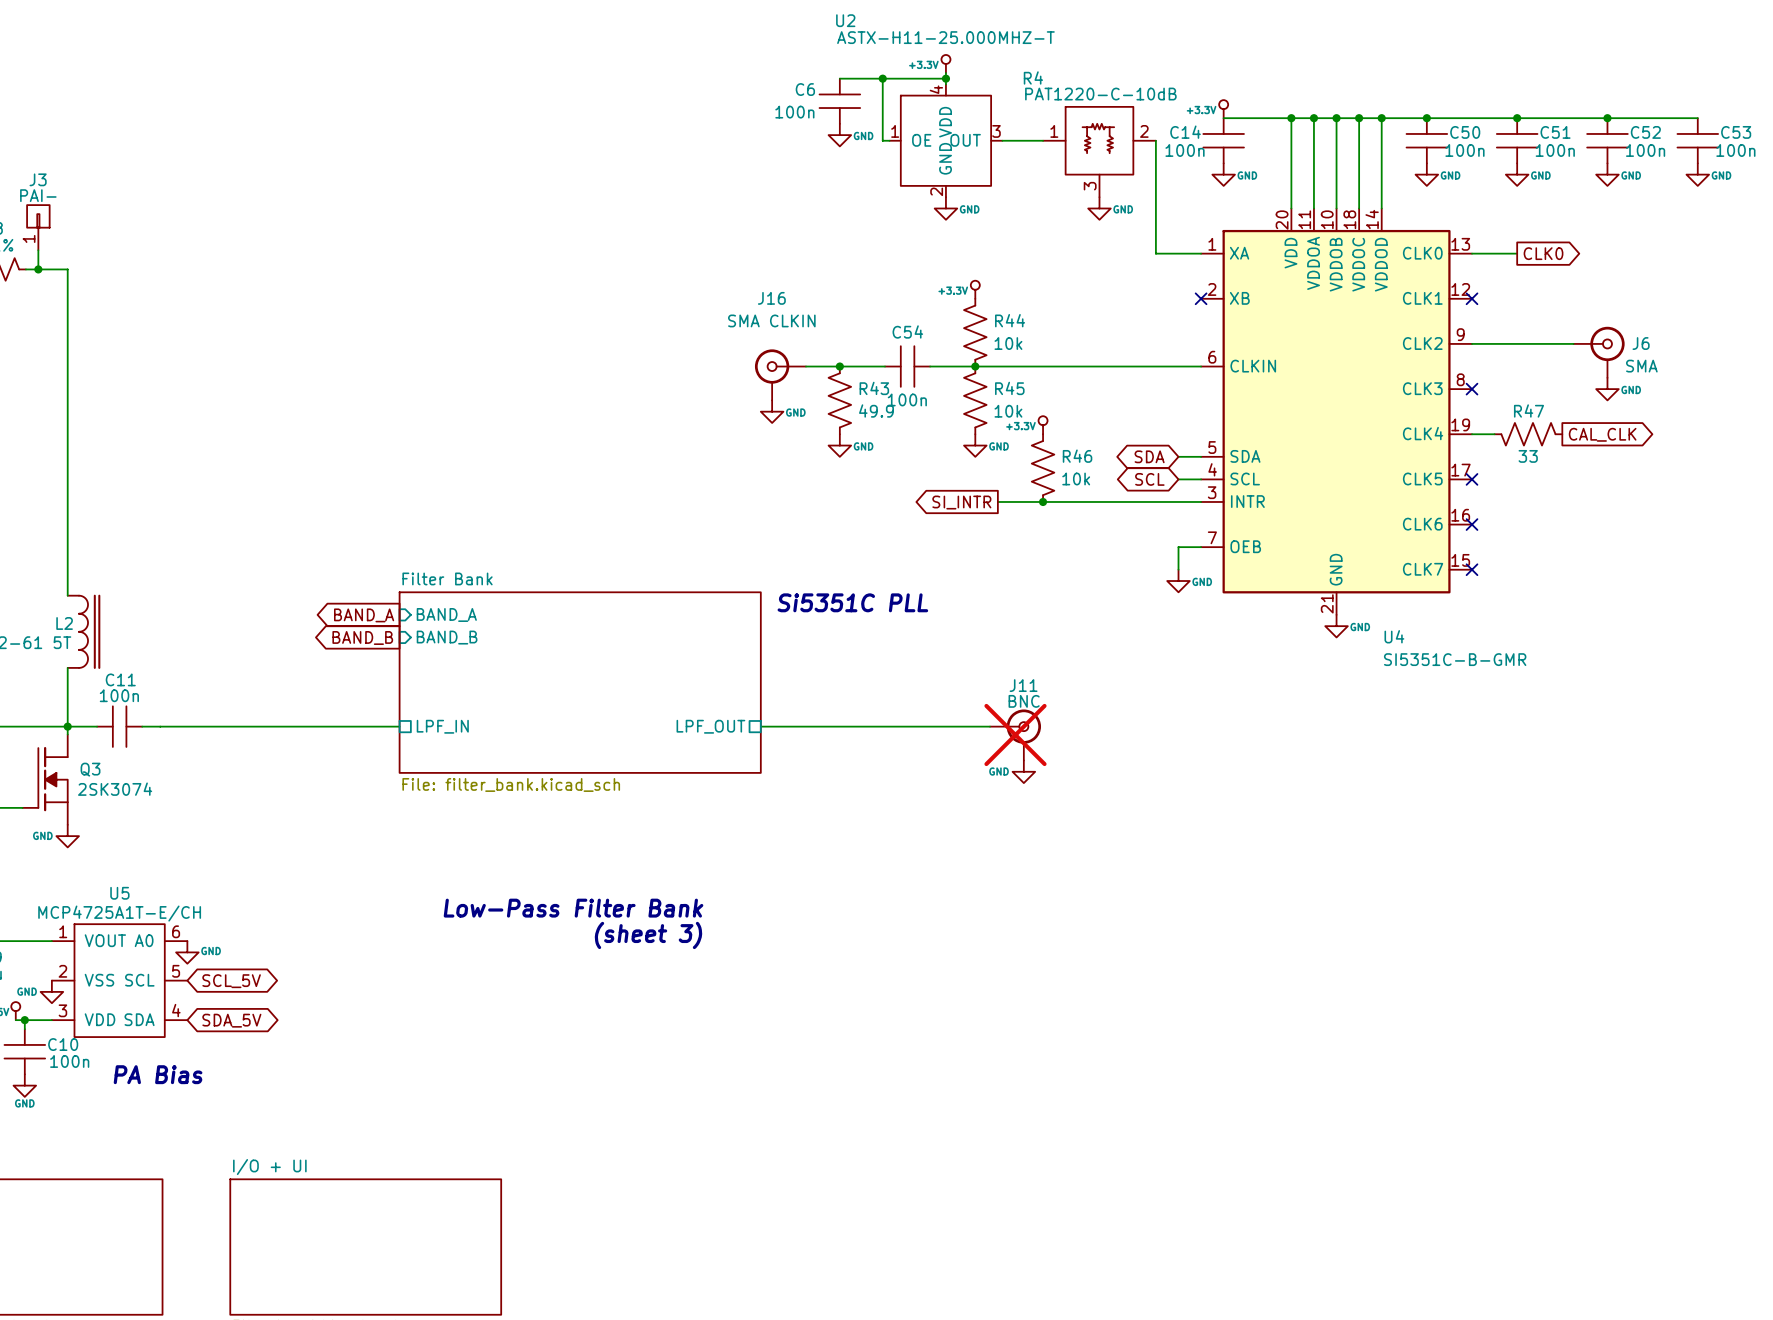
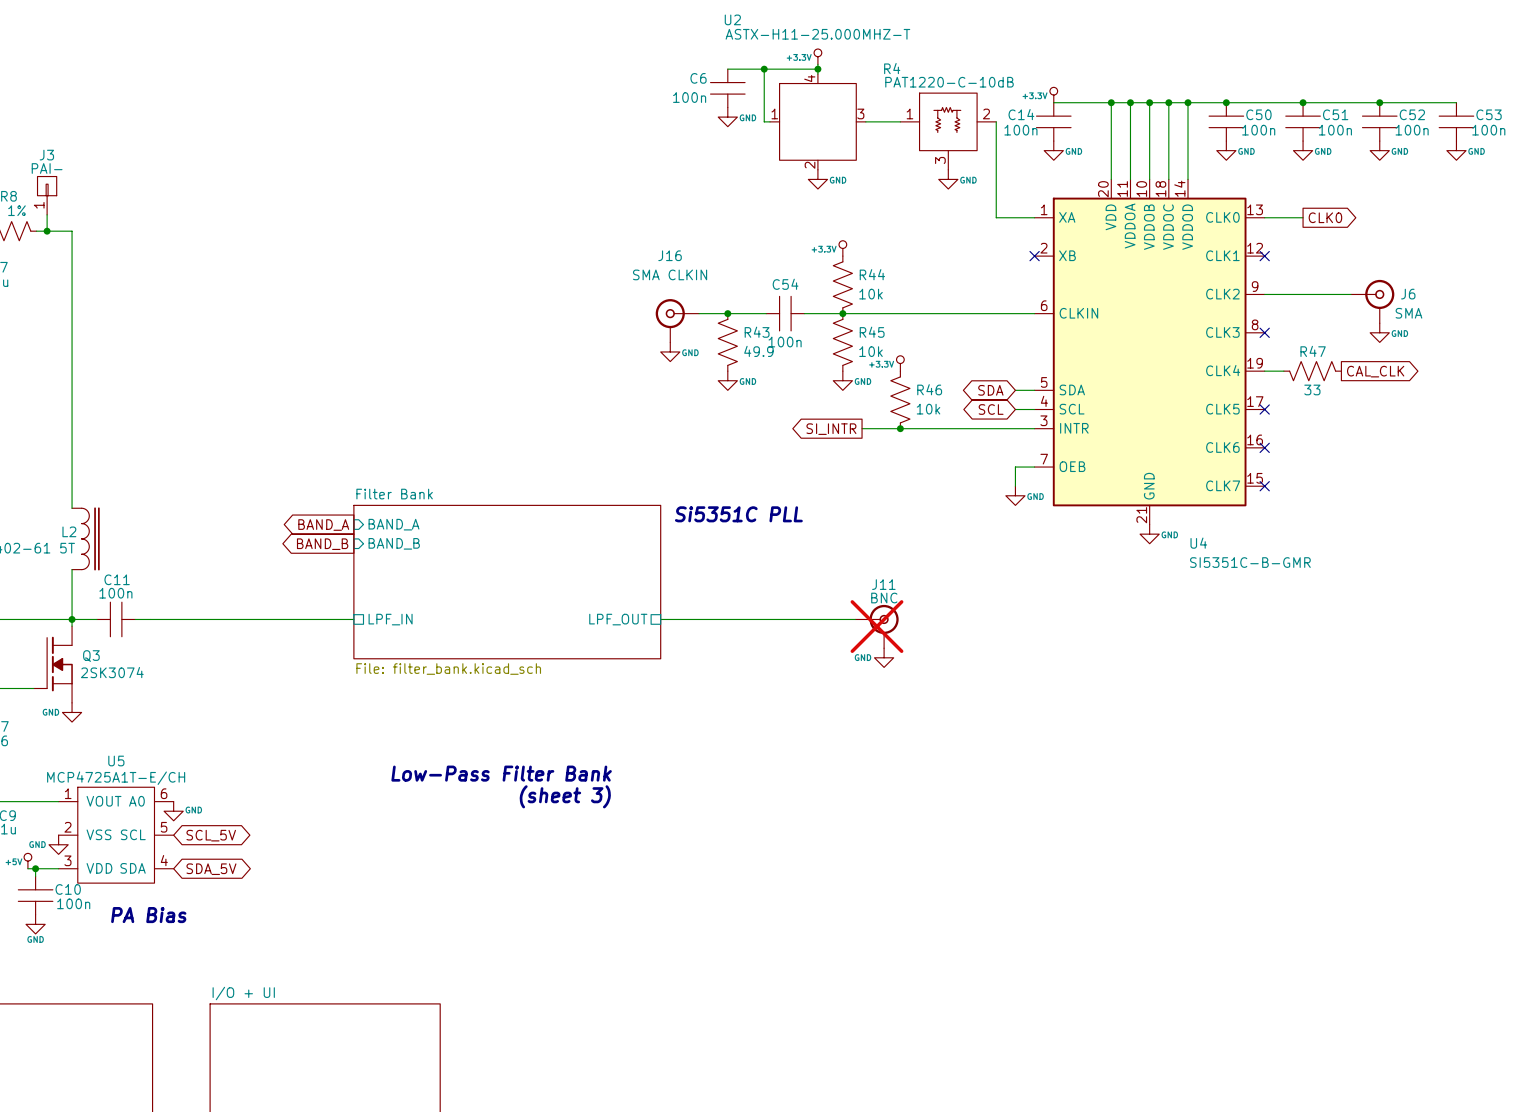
U2 pin name: VDD (945, 122) -> none
U2 pin name: OE (921, 140) -> none
U2 pin name: OUT (965, 140) -> none
U2 pin name: GND (945, 158) -> none

